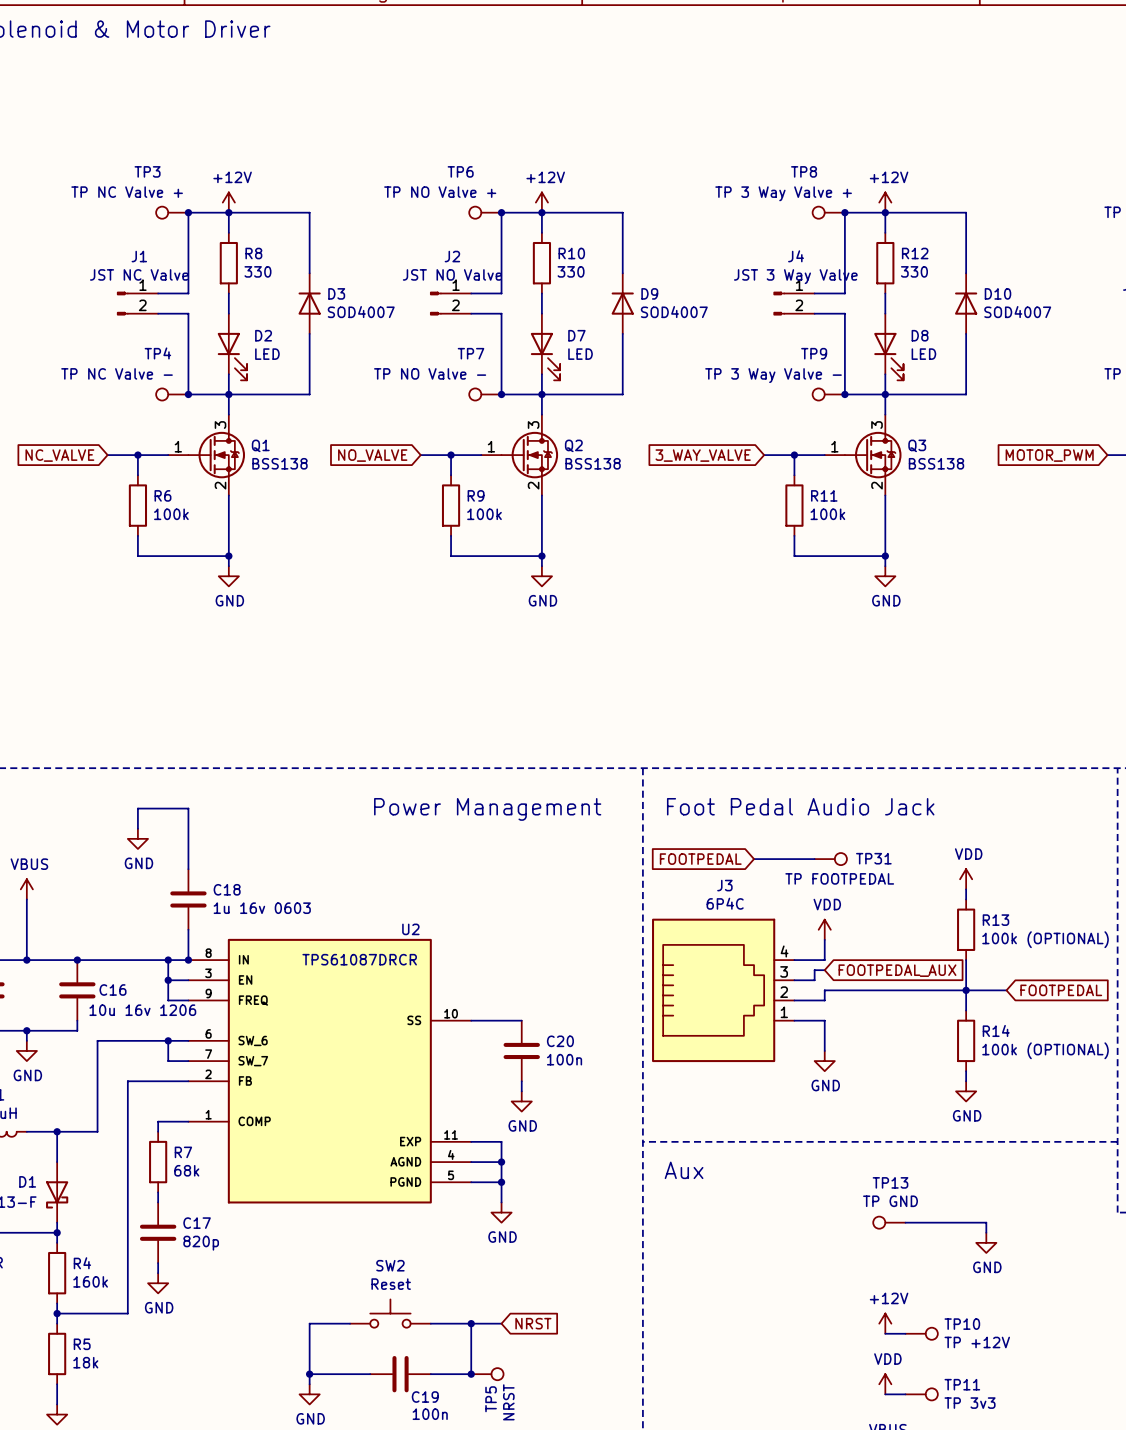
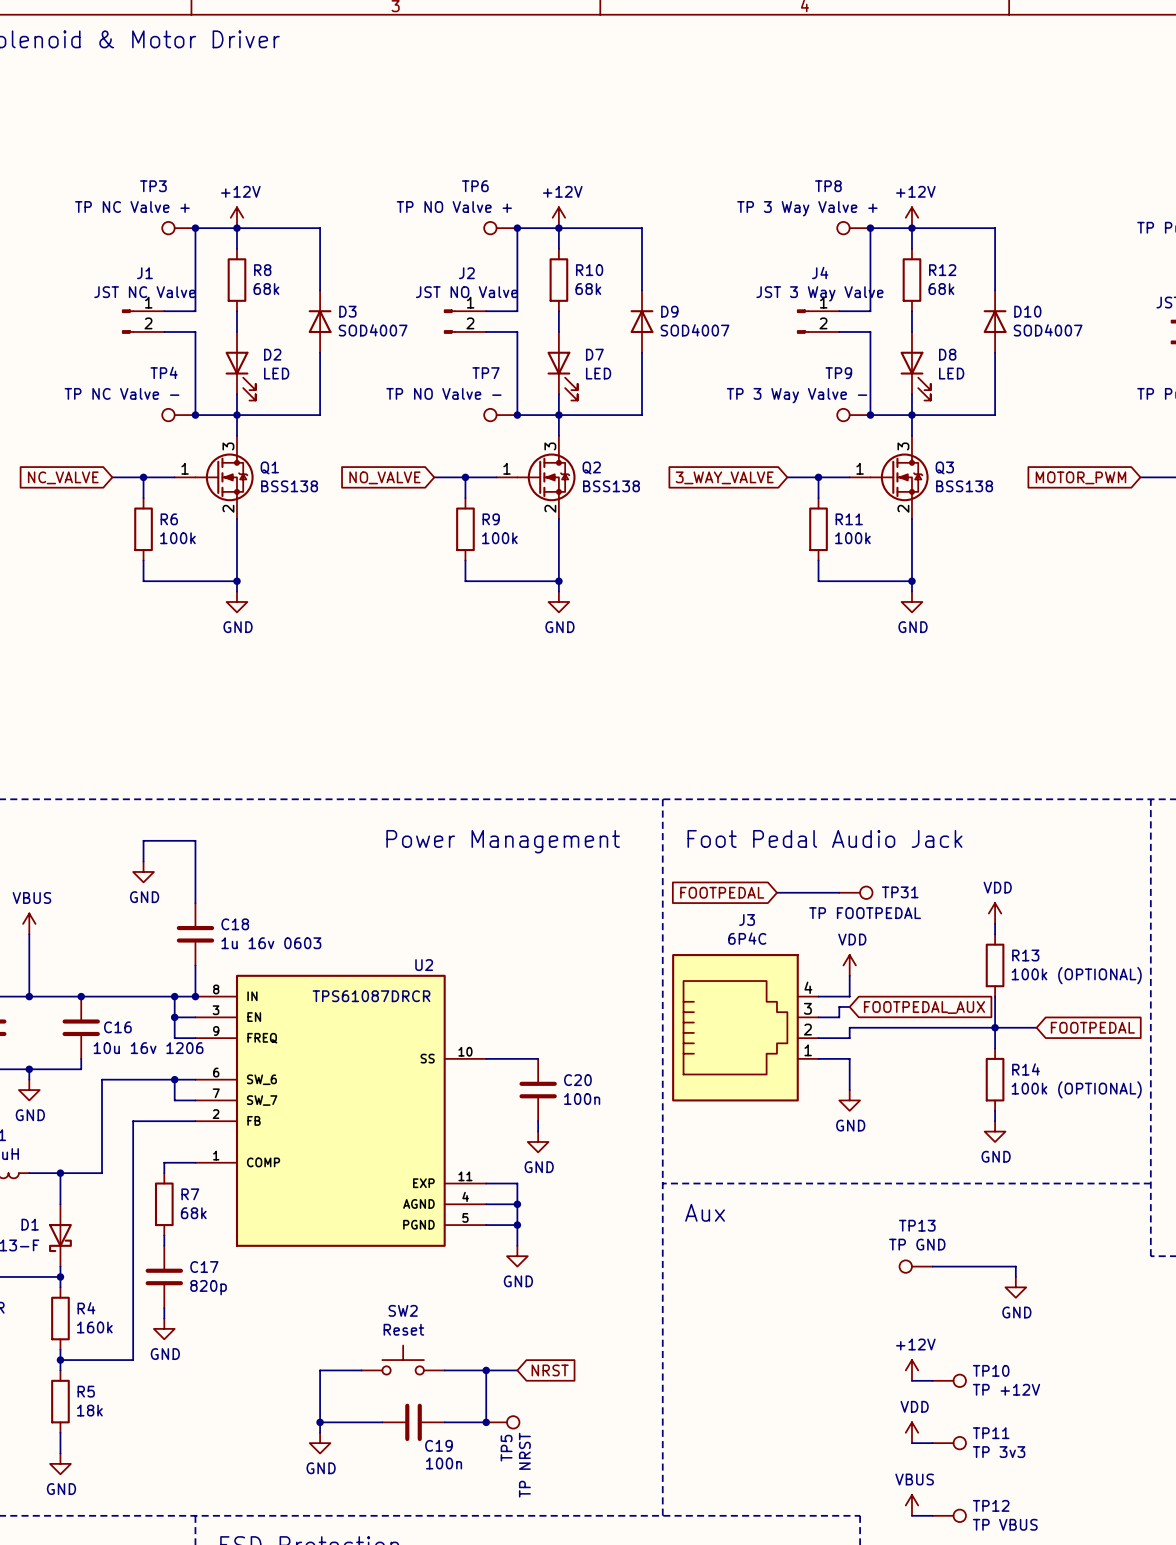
R8 value: 330 (257, 271) -> 68k (266, 289)
R10 value: 330 (571, 271) -> 68k (588, 289)
R12 value: 330 (914, 271) -> 68k (941, 289)

